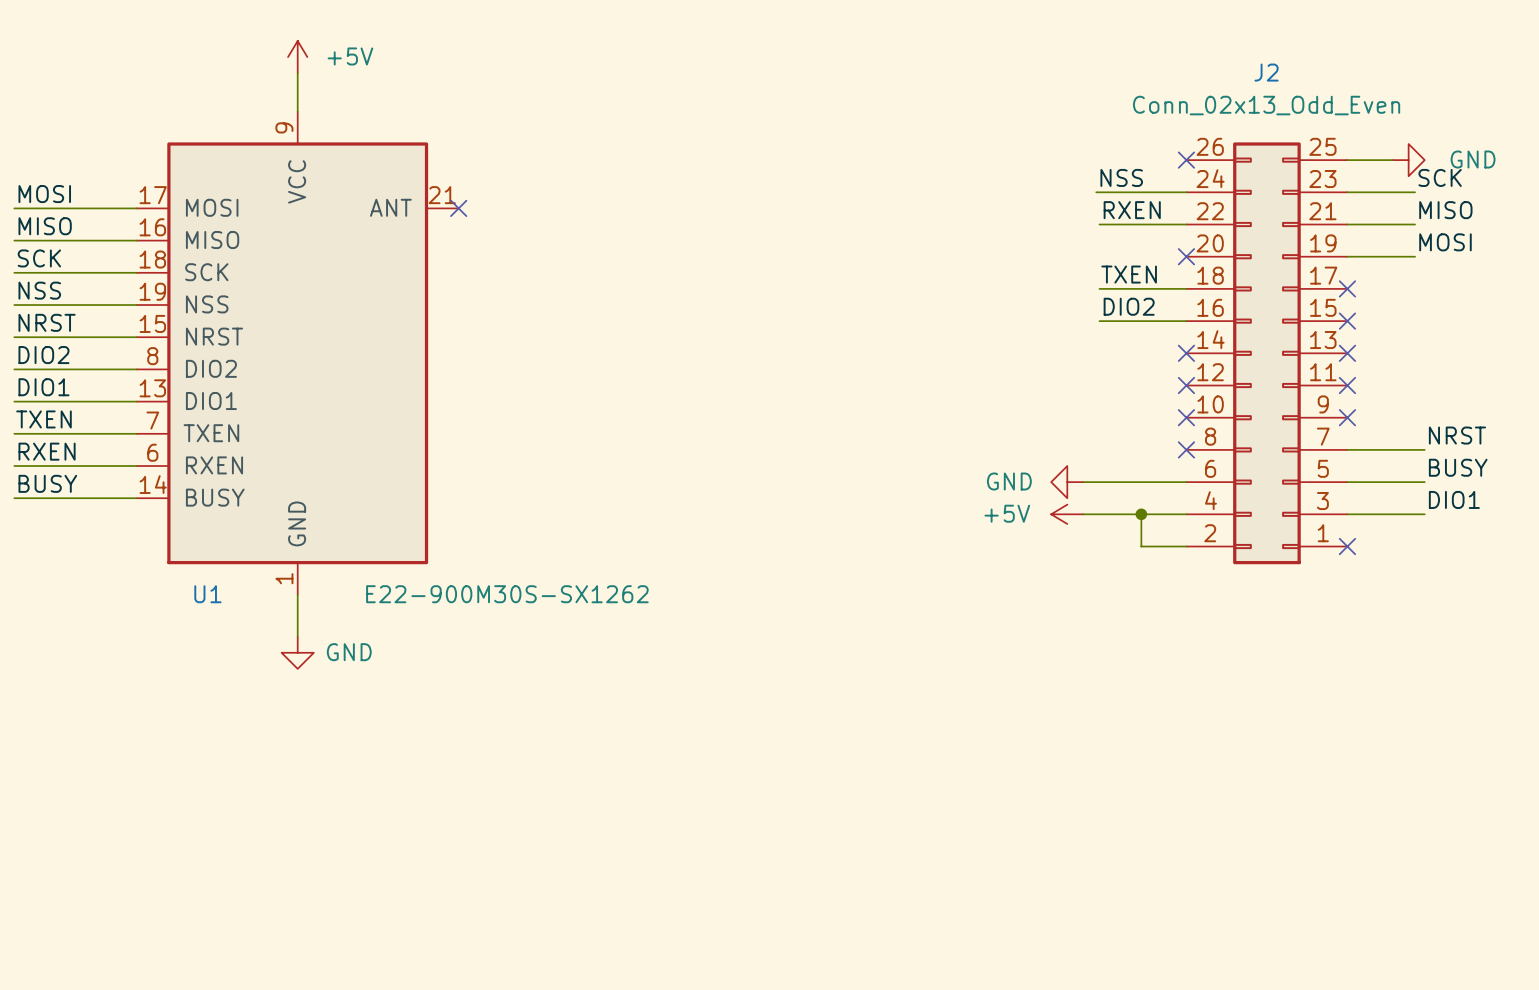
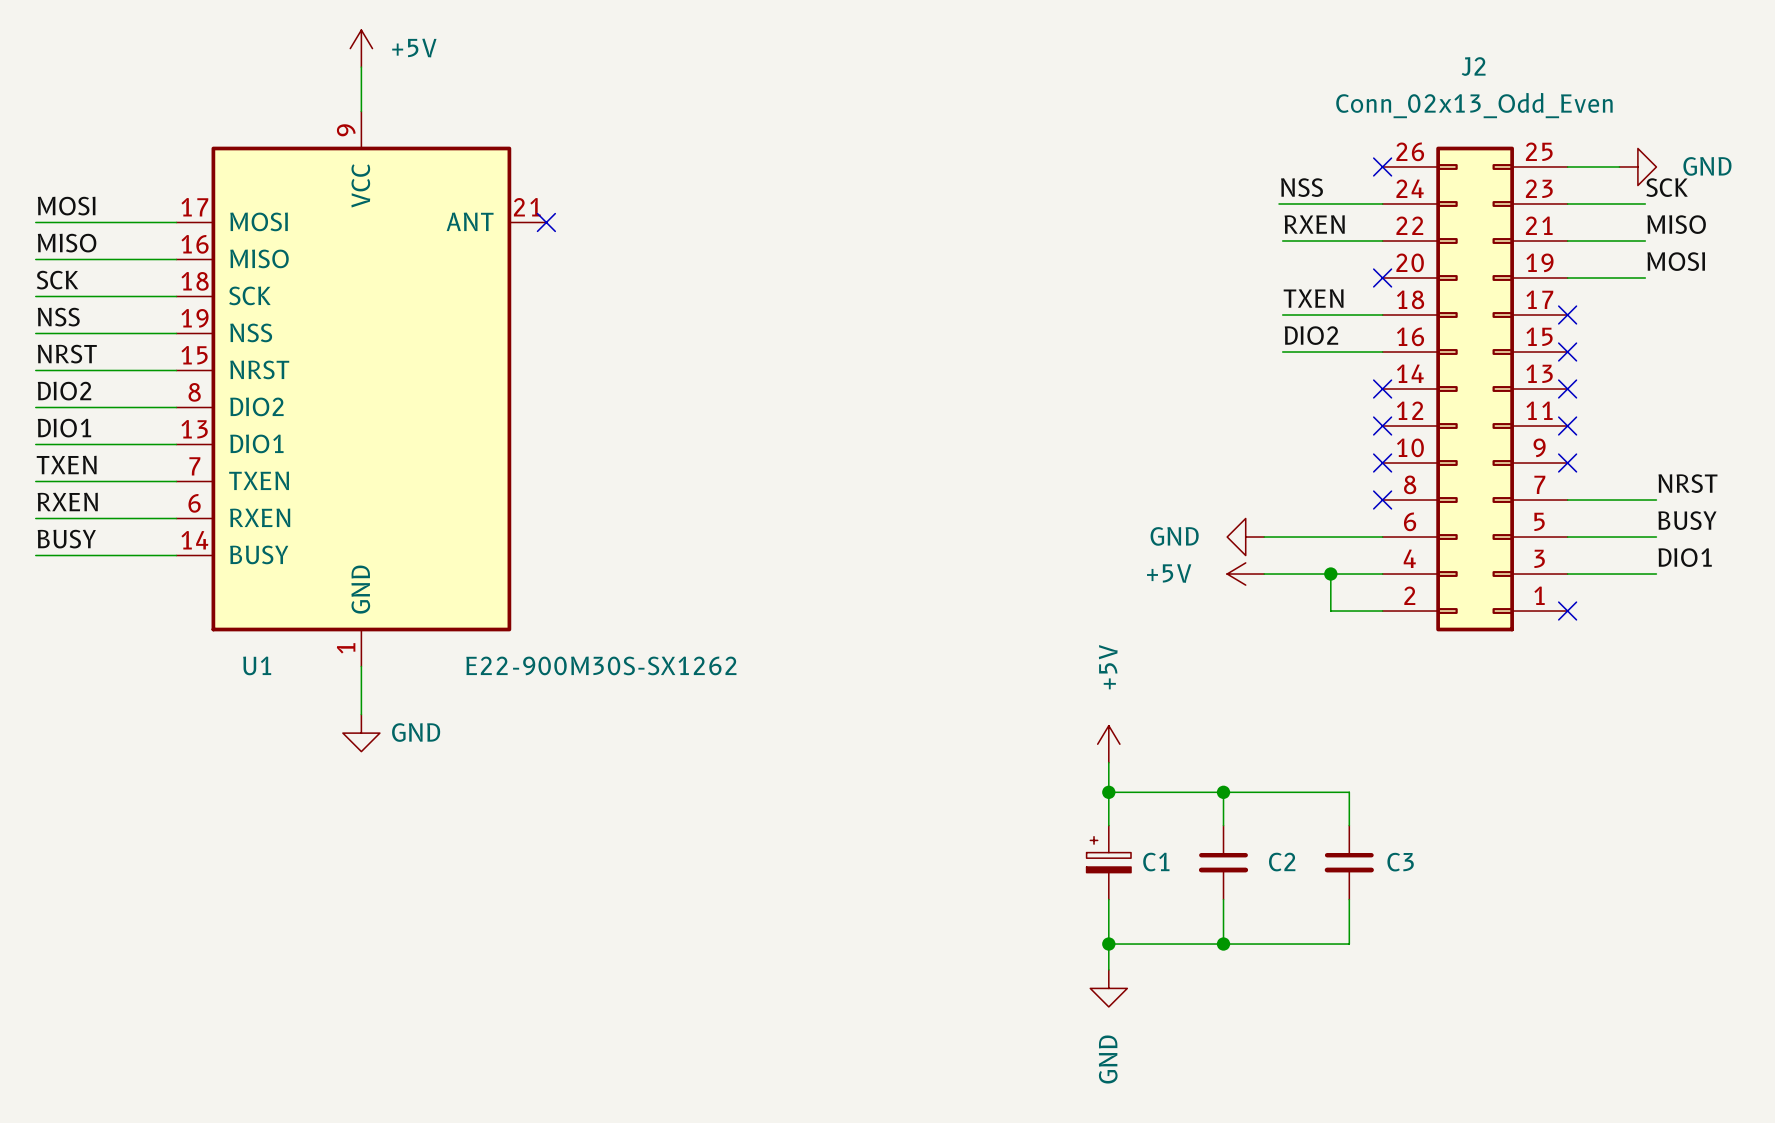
power symbol: none -> +5V (1108, 744)
wire: none -> (1108, 762) (1108, 825)
wire: none -> (1108, 792) (1349, 792) (1349, 825)
junction: none -> (1108, 792)
wire: none -> (1223, 792) (1223, 825)
junction: none -> (1223, 792)
C1: none -> (1108, 862)
C2: none -> (1223, 862)
C3: none -> (1349, 862)
wire: none -> (1108, 899) (1108, 969)
wire: none -> (1223, 899) (1223, 944)
wire: none -> (1349, 899) (1349, 944) (1108, 944)
junction: none -> (1108, 944)
junction: none -> (1223, 944)
power symbol: none -> GND (1108, 988)

